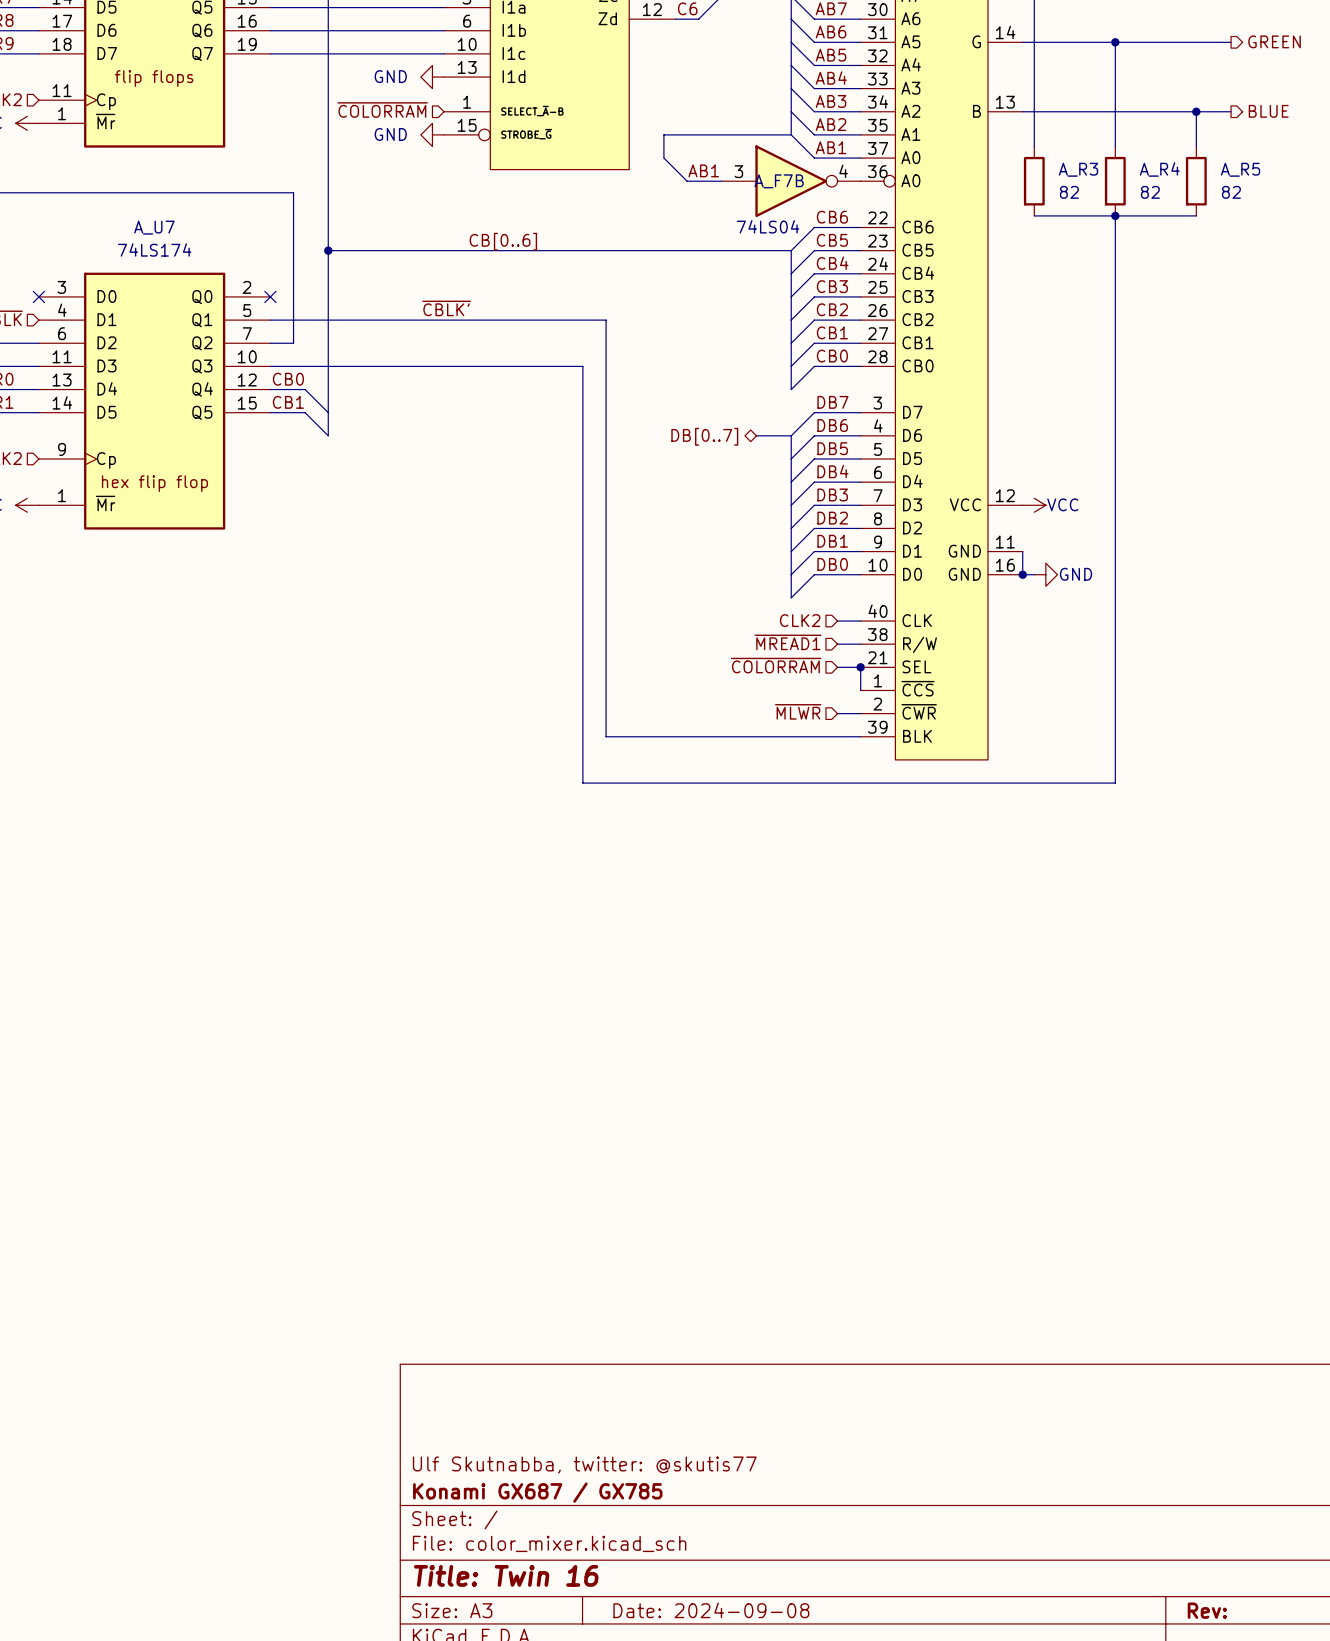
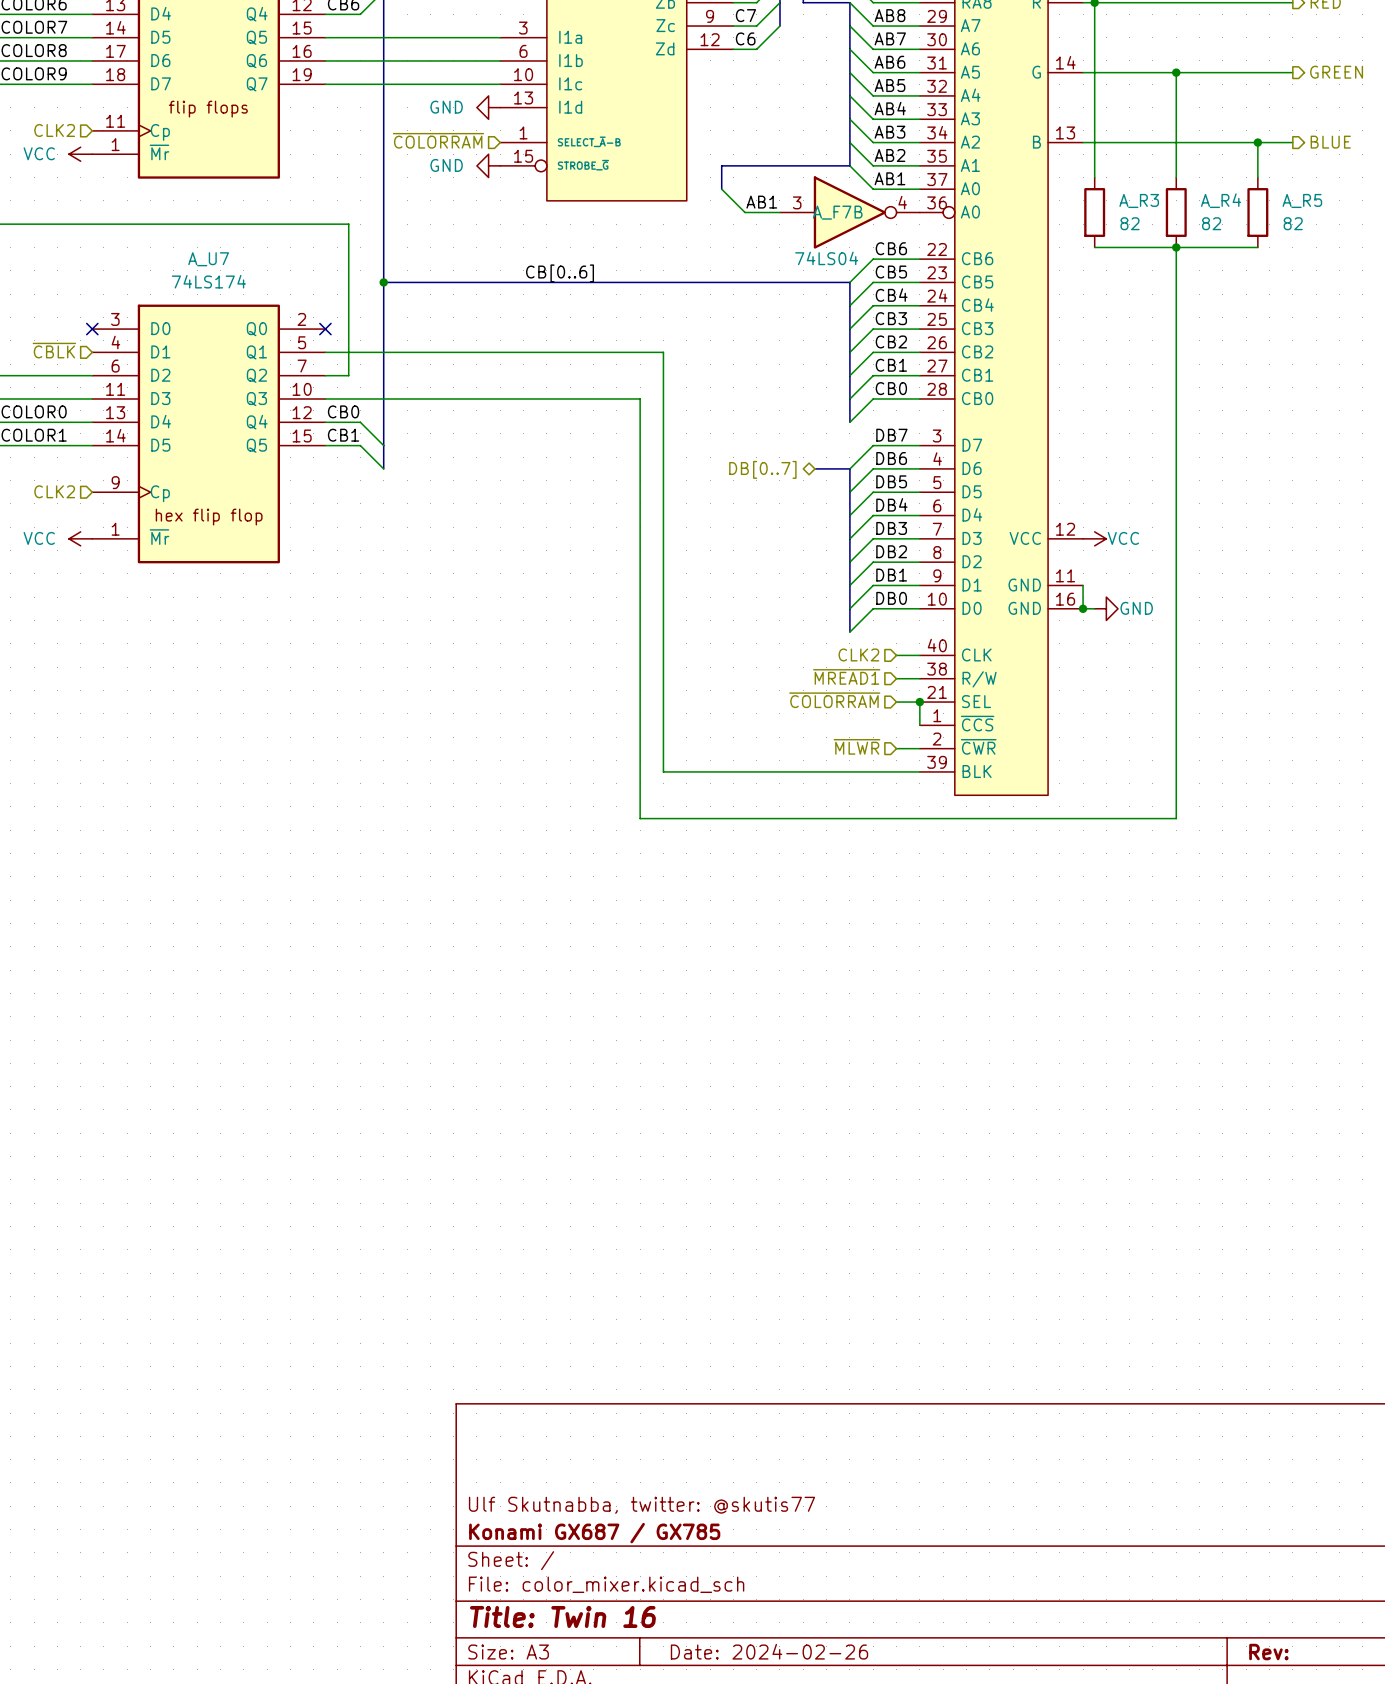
label: ~{CBLK'} (446, 308) -> none
title block: Date: 2024-09-08 (711, 1610) -> Date: 2024-02-26 (769, 1651)

